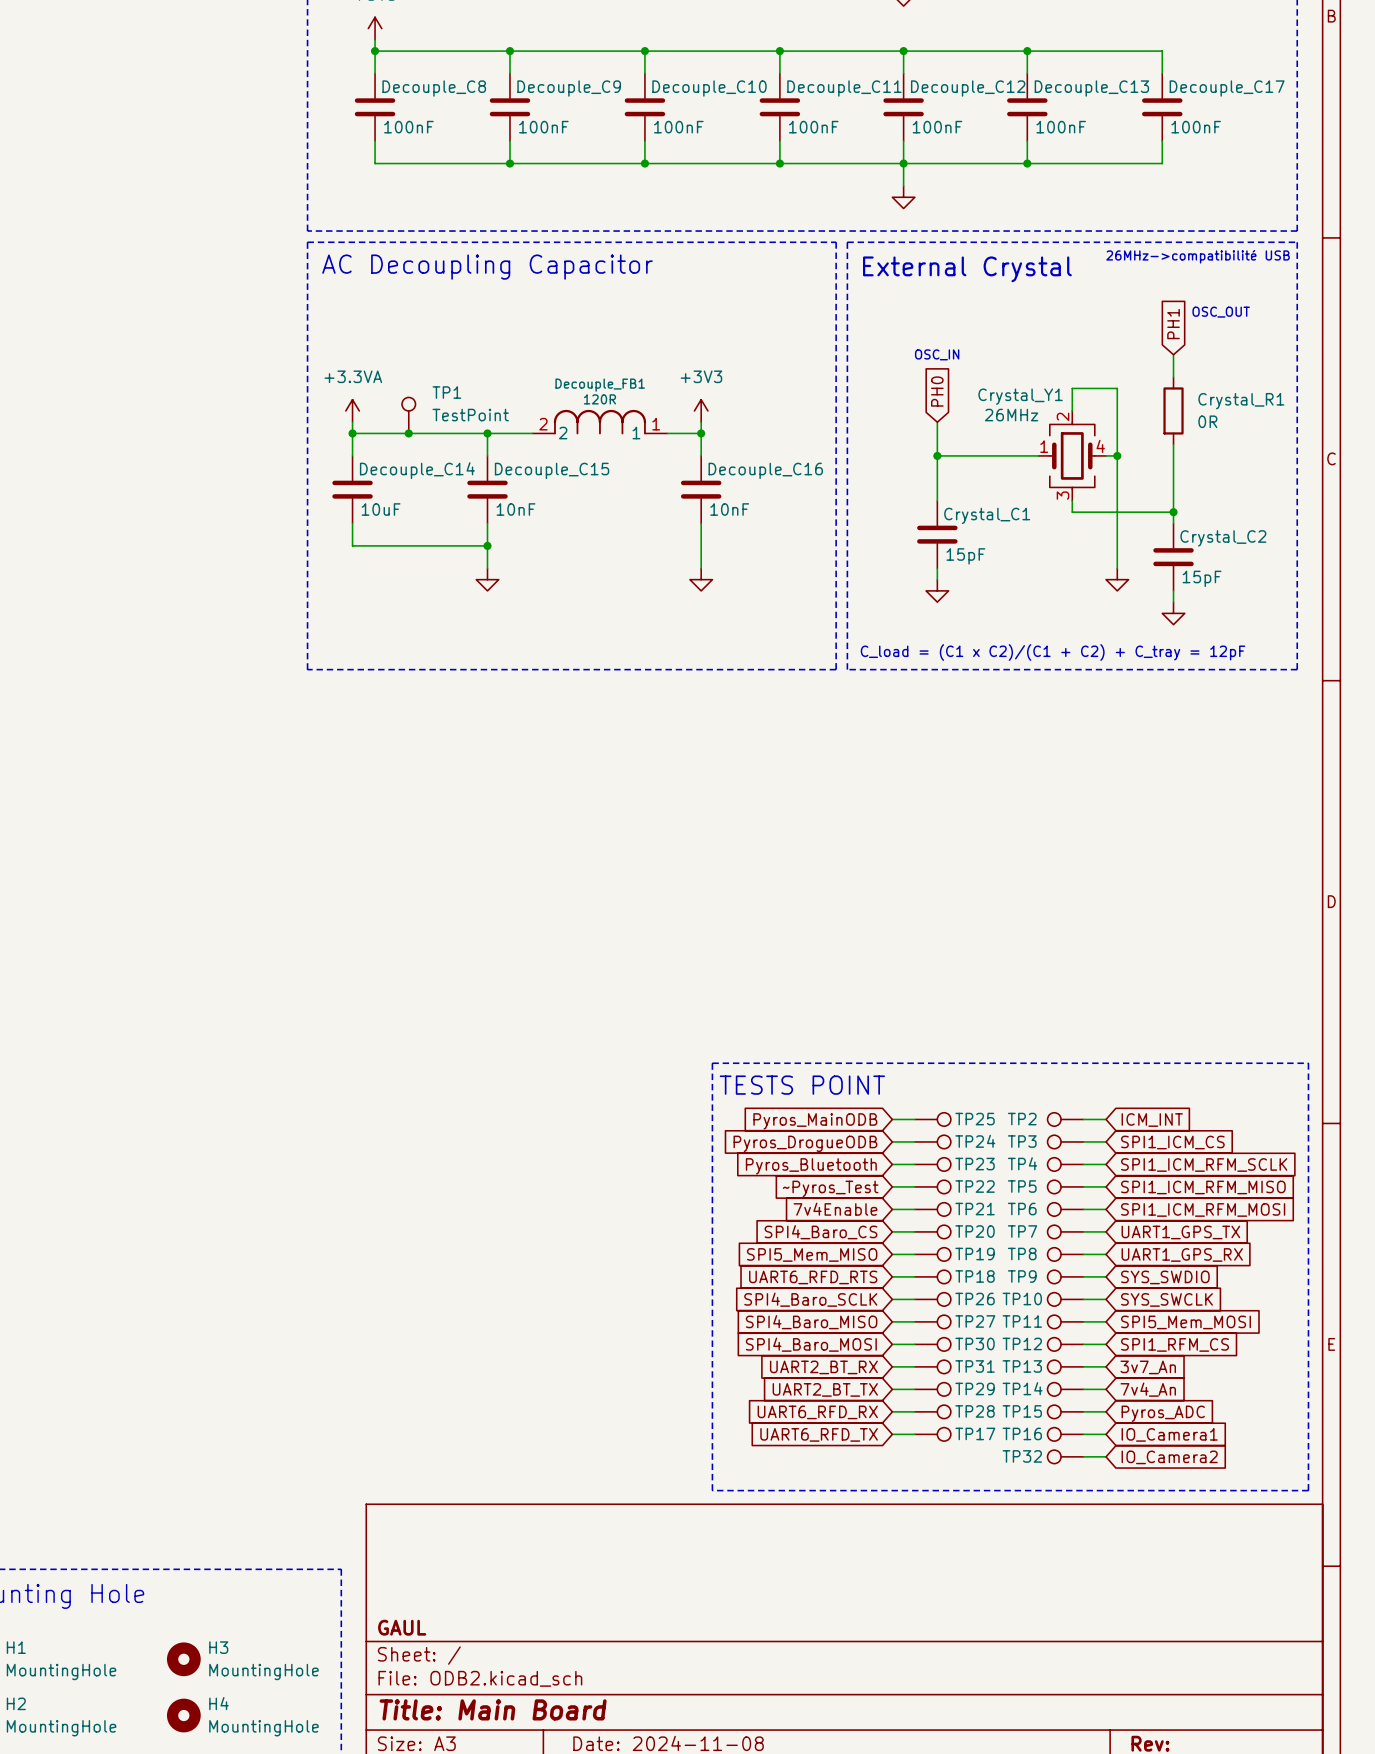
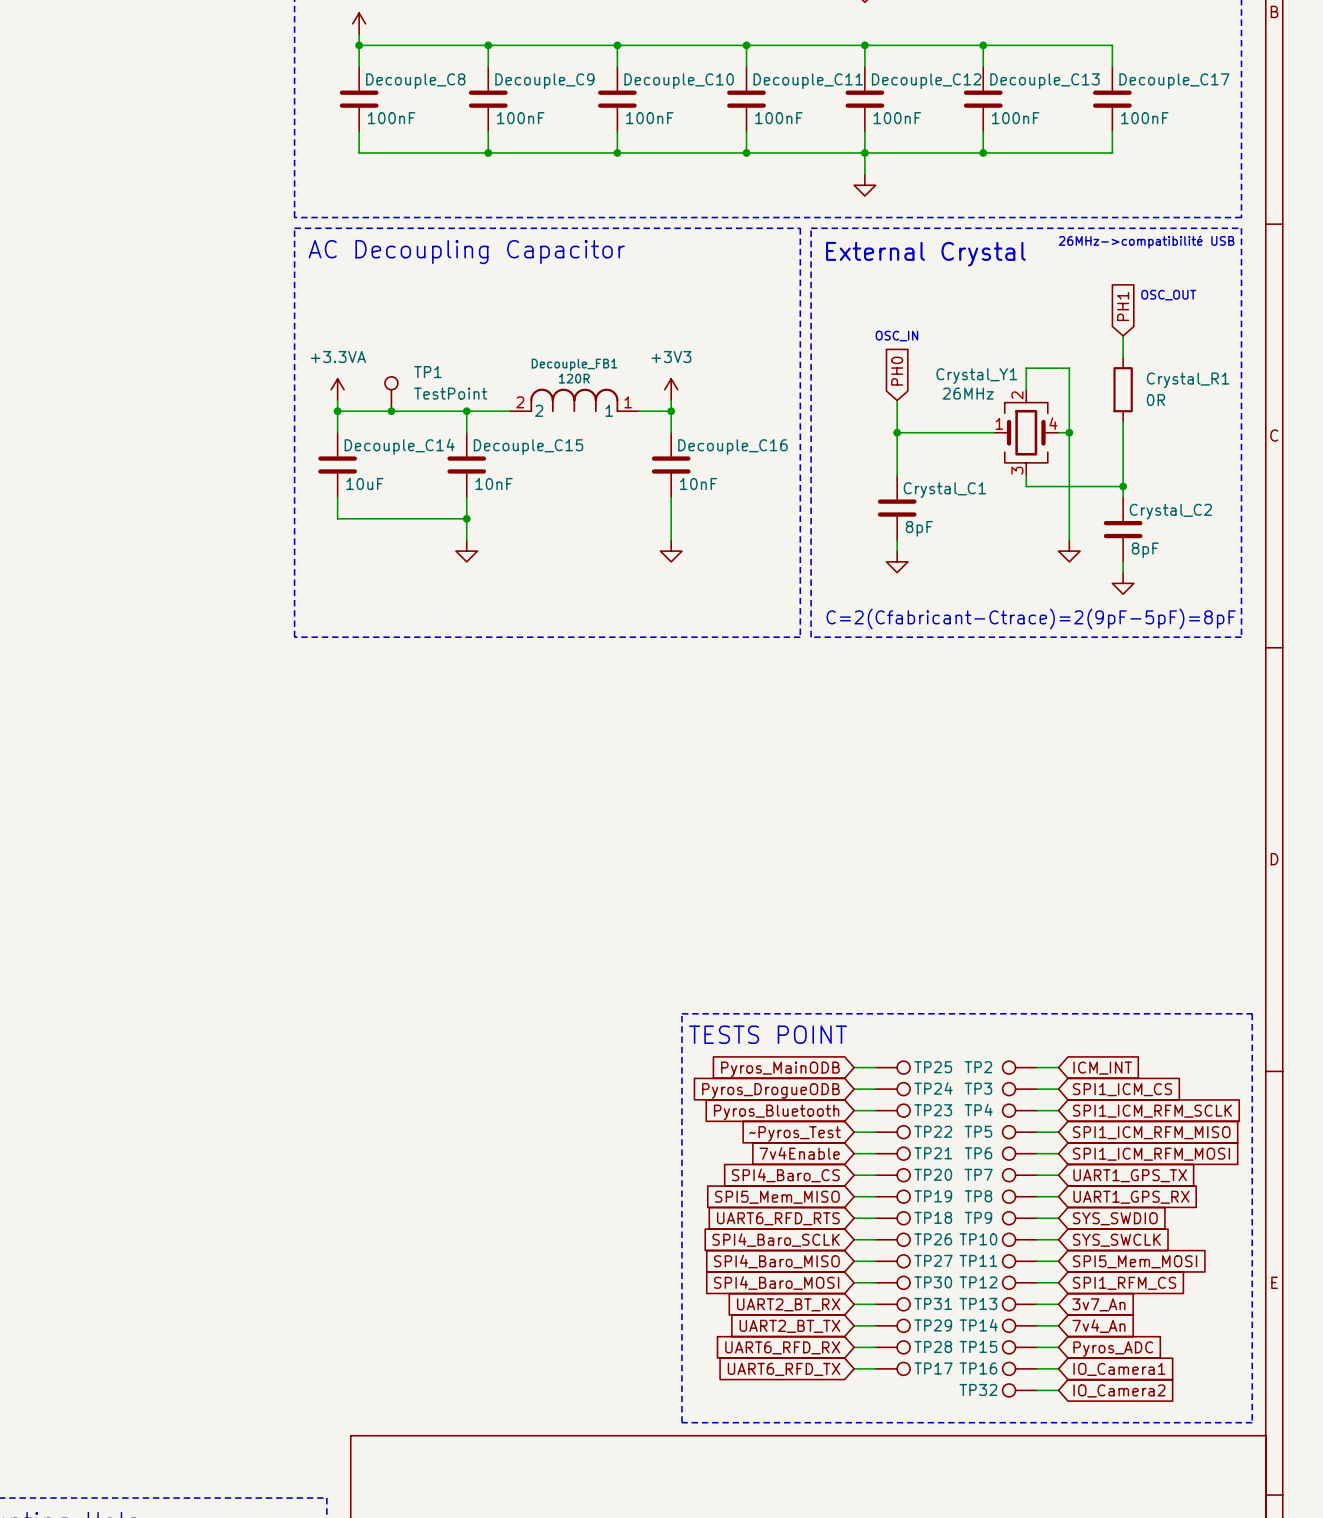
Crystal_C1 value: 15pF (965, 556) -> 8pF (919, 528)
Crystal_C2 value: 15pF (1202, 578) -> 8pF (1145, 550)
text: C_load = (C1 x C2)/(C1 + C2) + C_tray = 12pF (1053, 652) -> C=2(Cfabricant-Ctrace)=2(9pF-5pF)=8pF (1031, 618)

